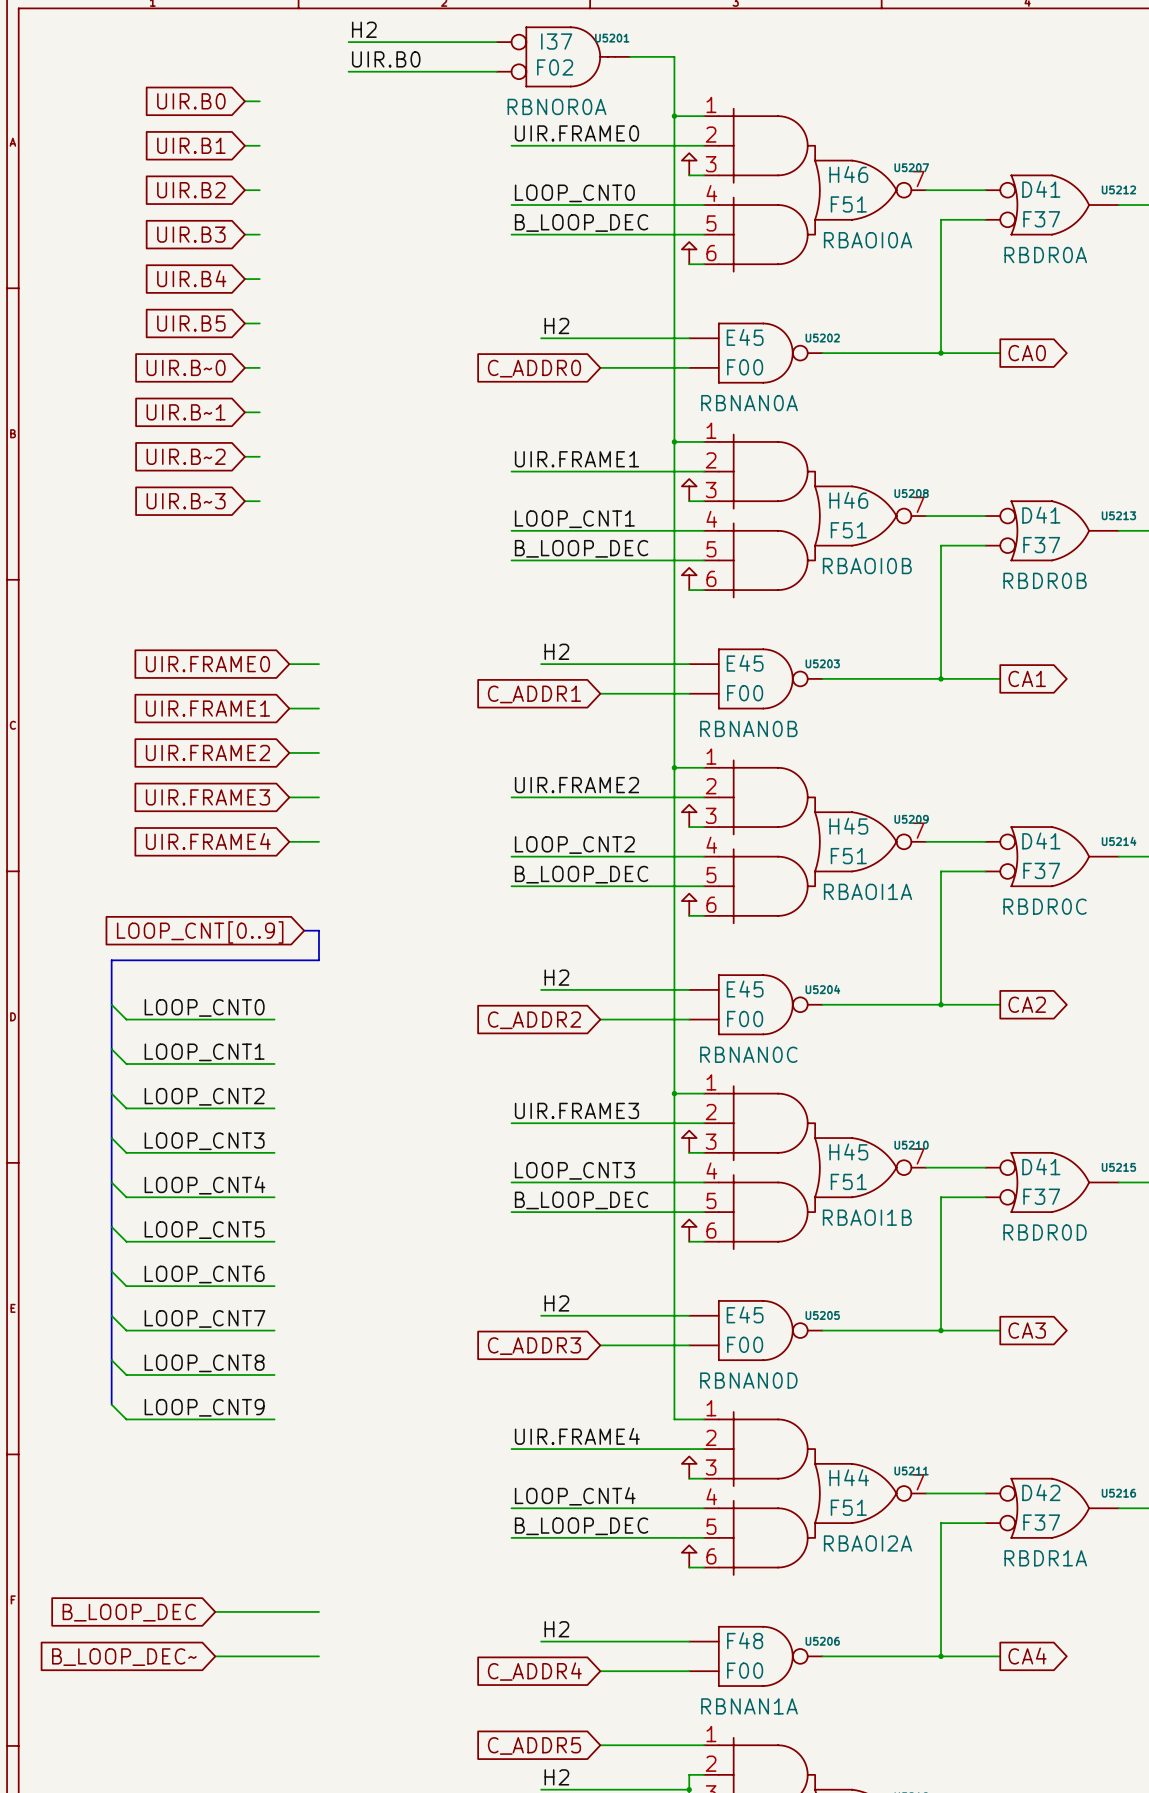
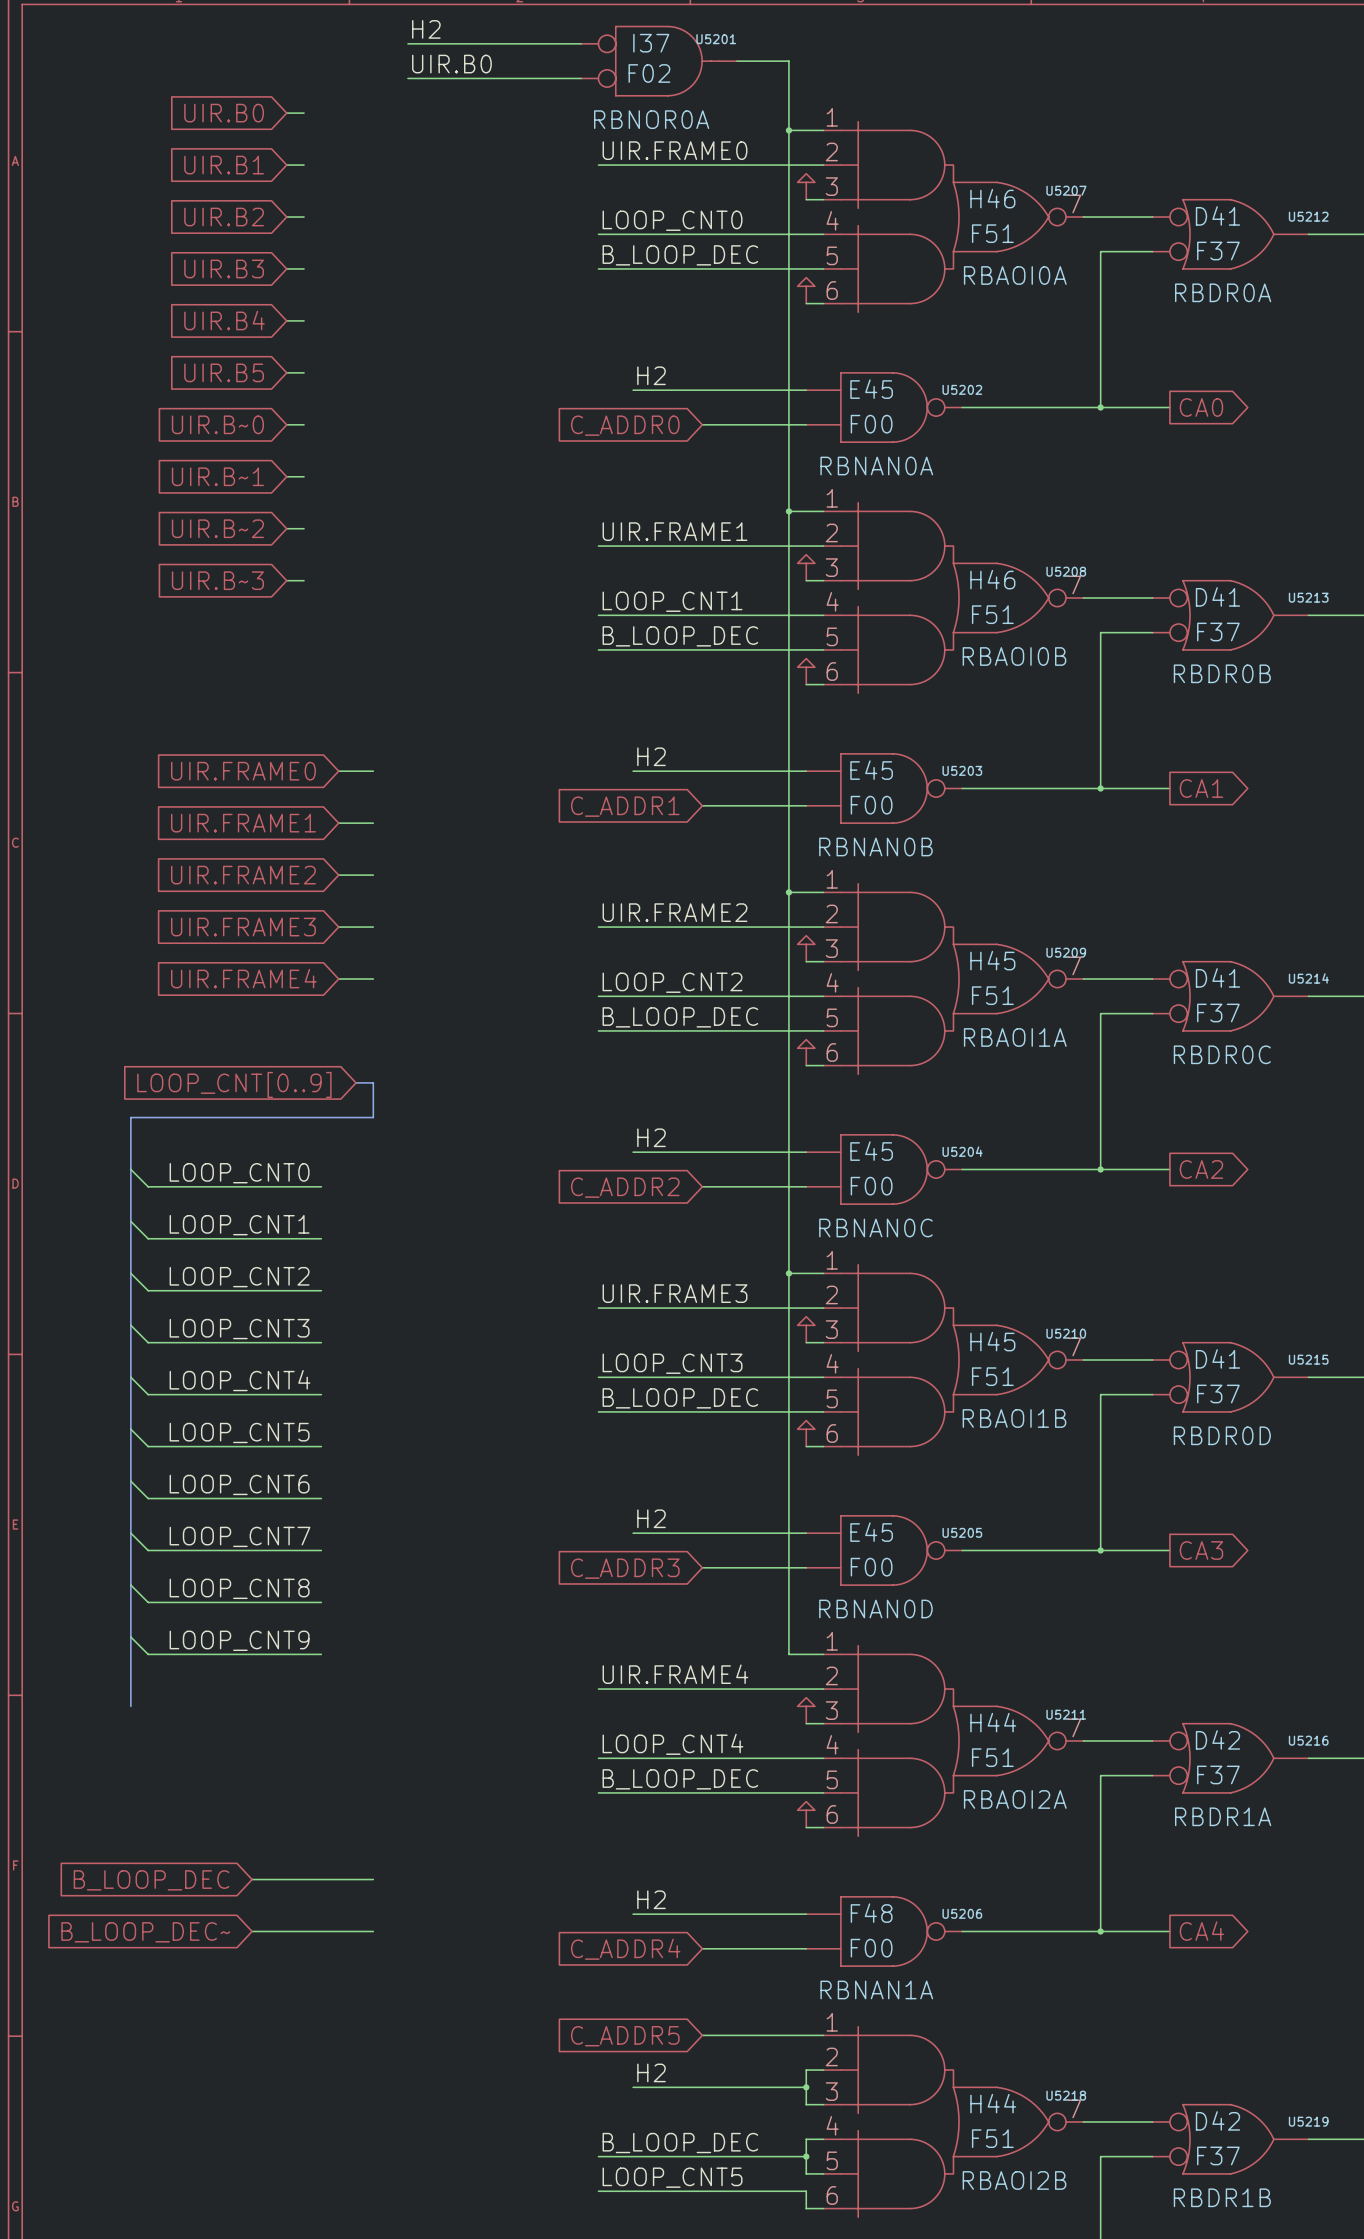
bus: none -> (130, 1637) (130, 1706)

